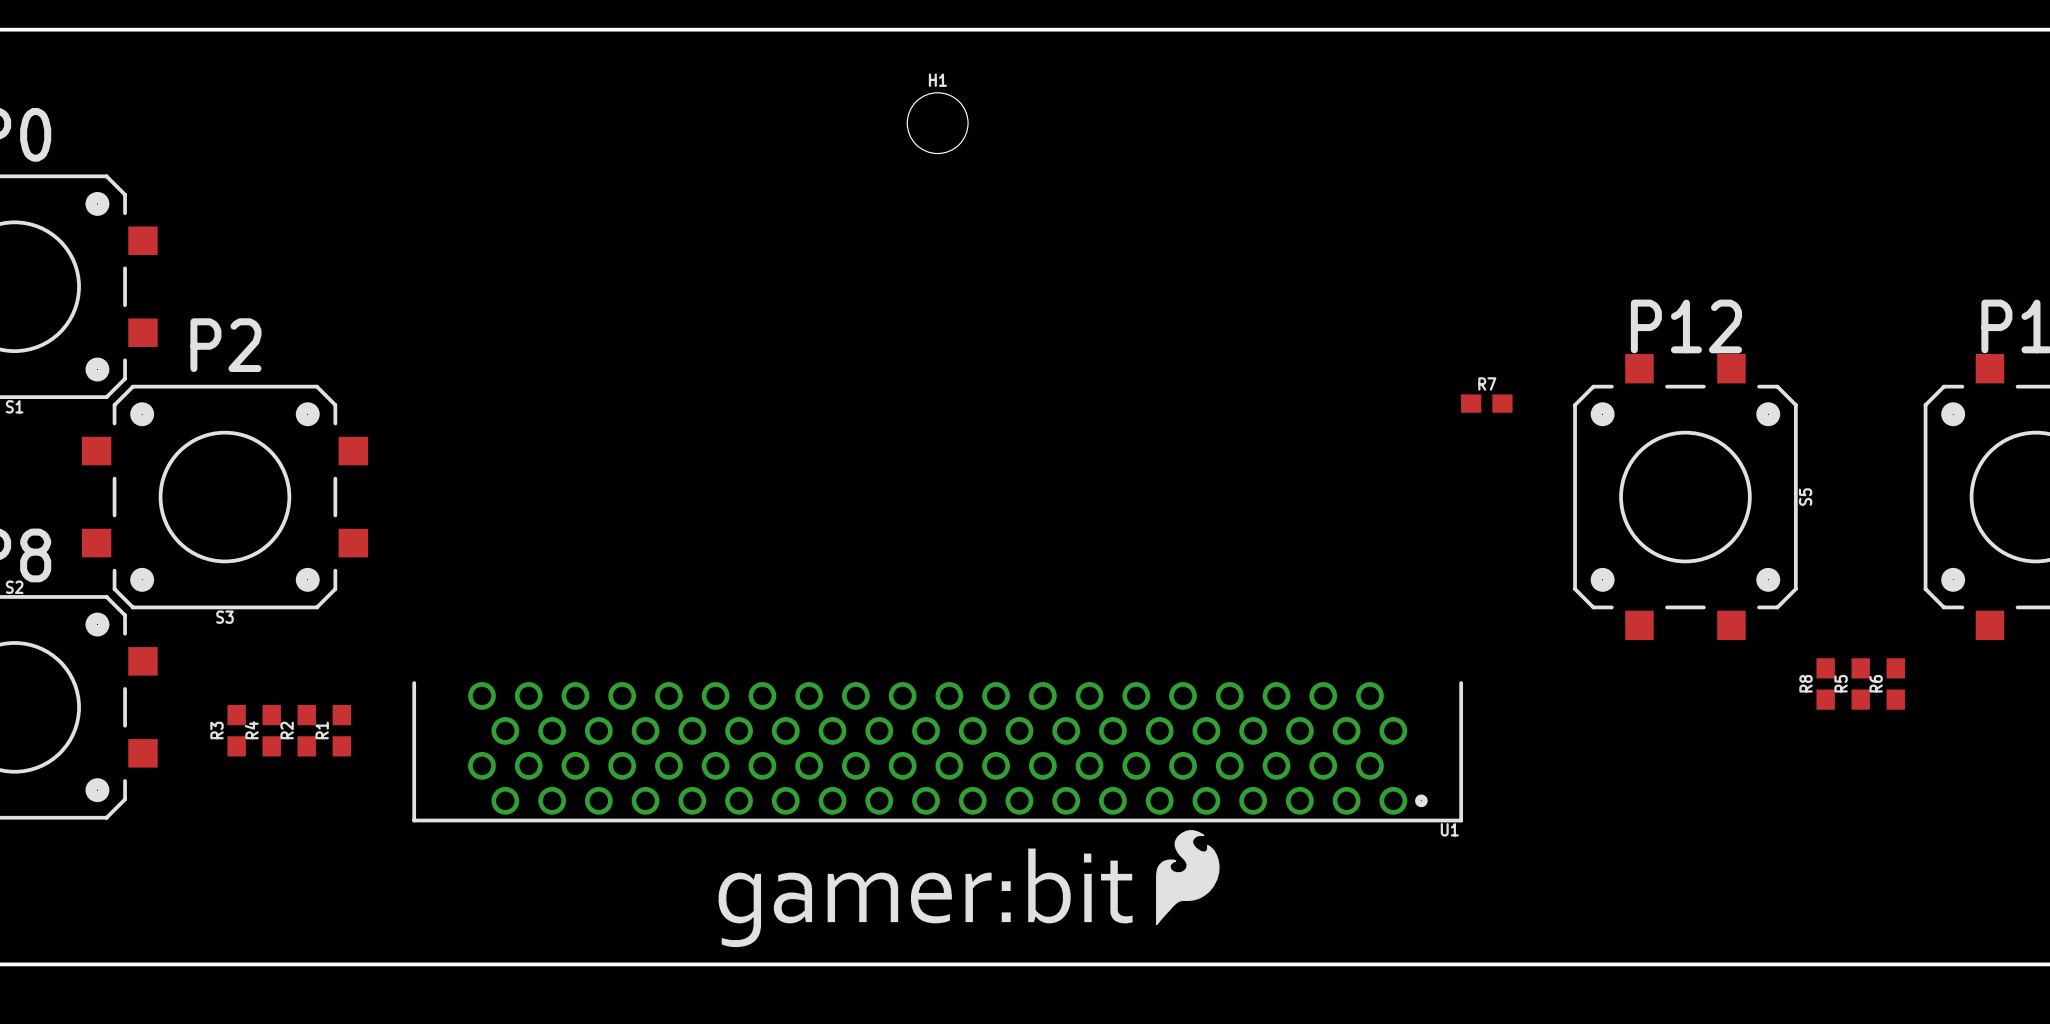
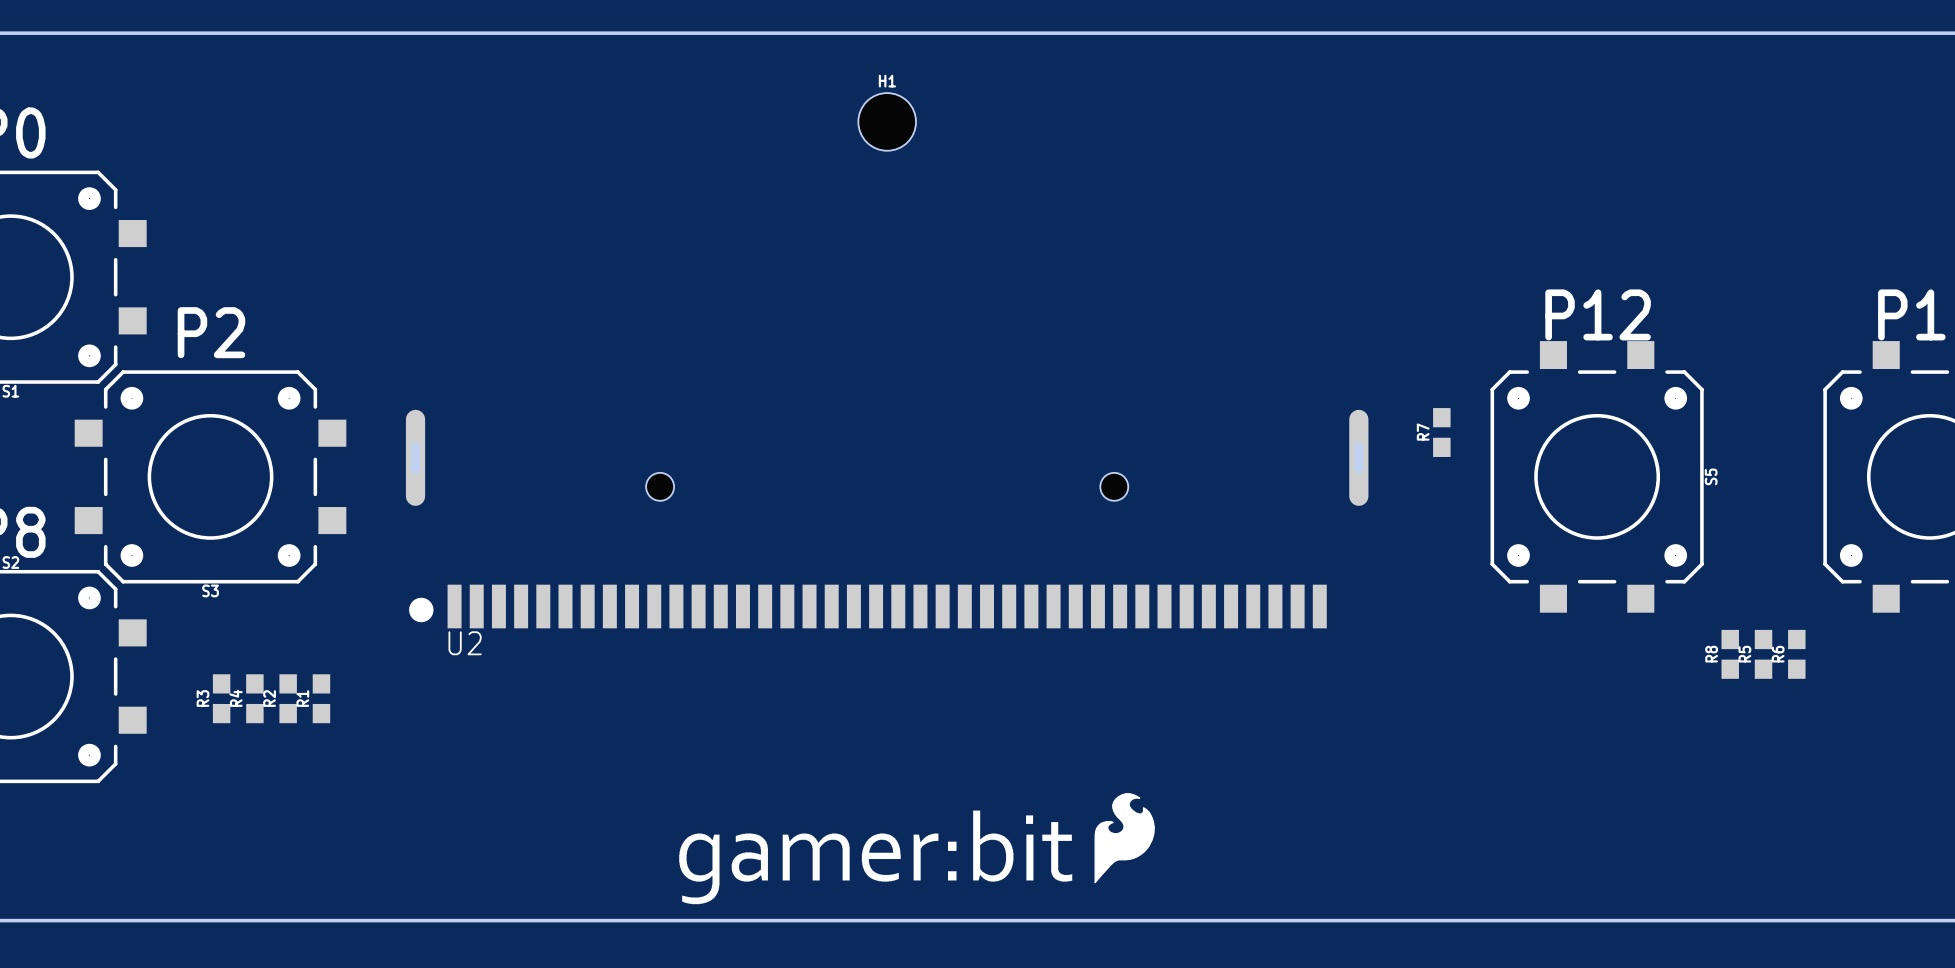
R7 rotation: 0° (1486, 403) -> 90° clockwise (1441, 432)
R7 position: (1486, 403) -> (1441, 432)
U2: none -> (887, 519)
U1: (937, 751) -> none

